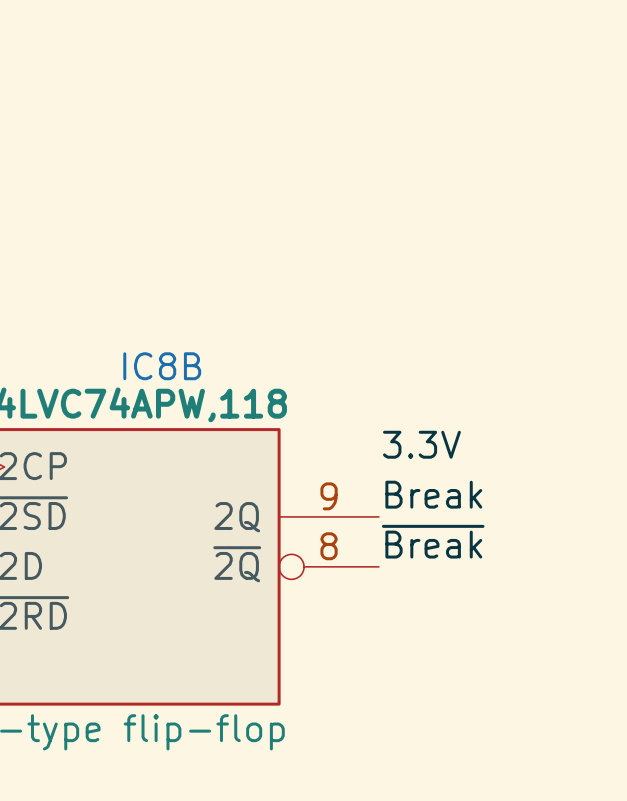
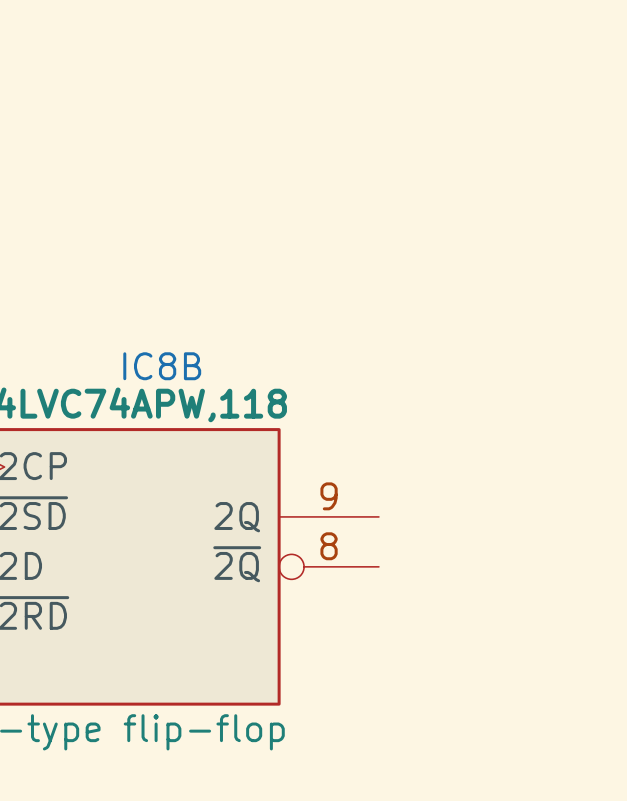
label: 3.3V (421, 444) -> none
label: Break (433, 494) -> none
label: ~{Break} (433, 541) -> none

